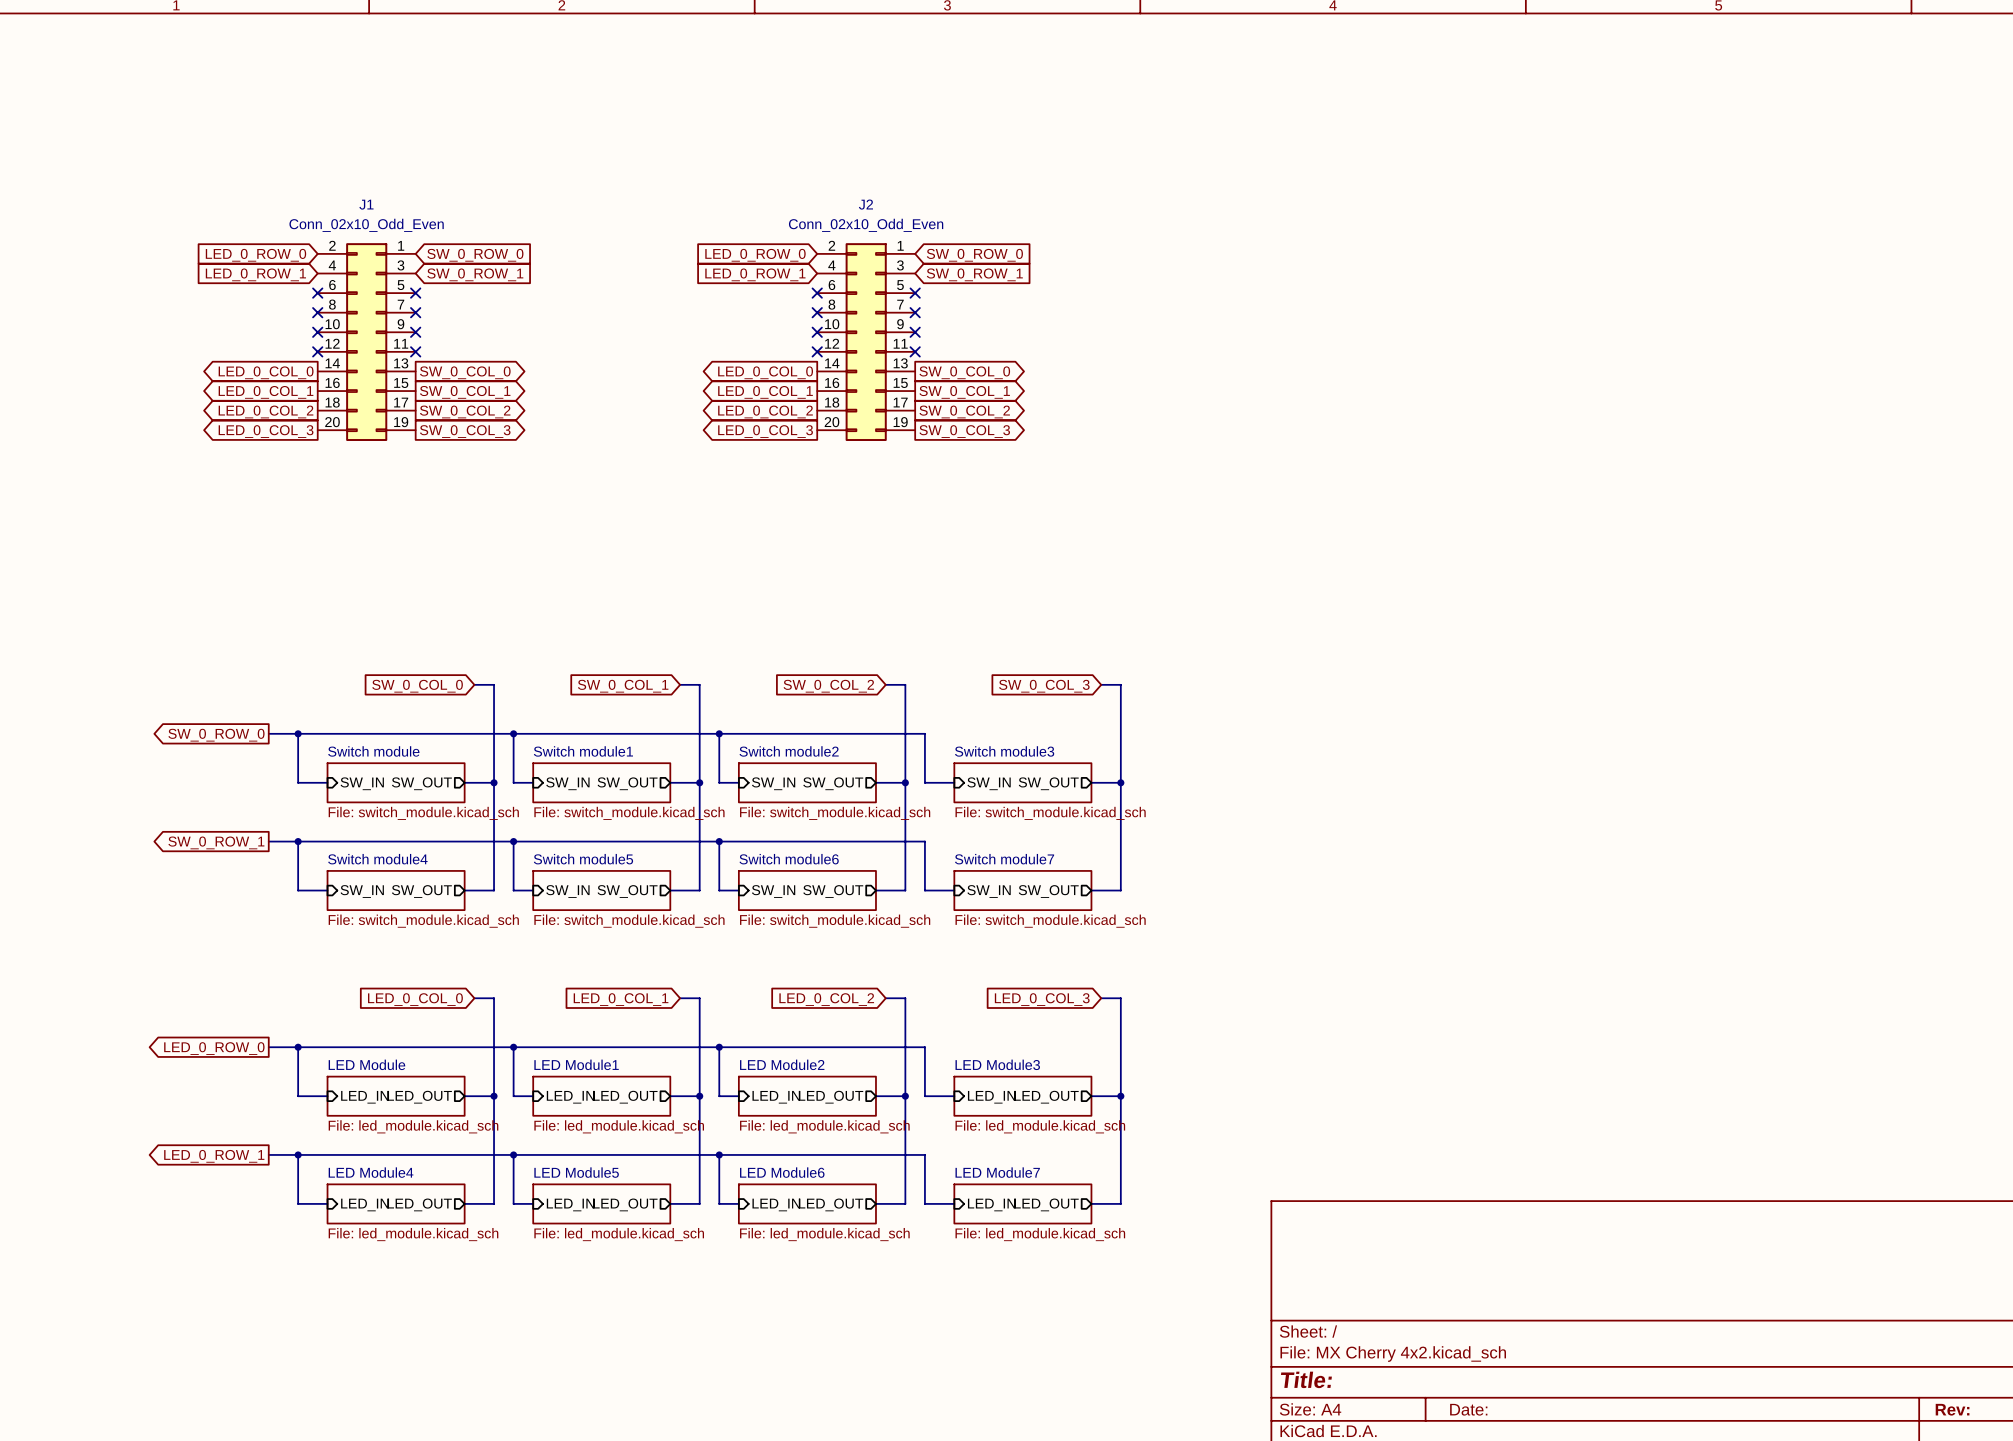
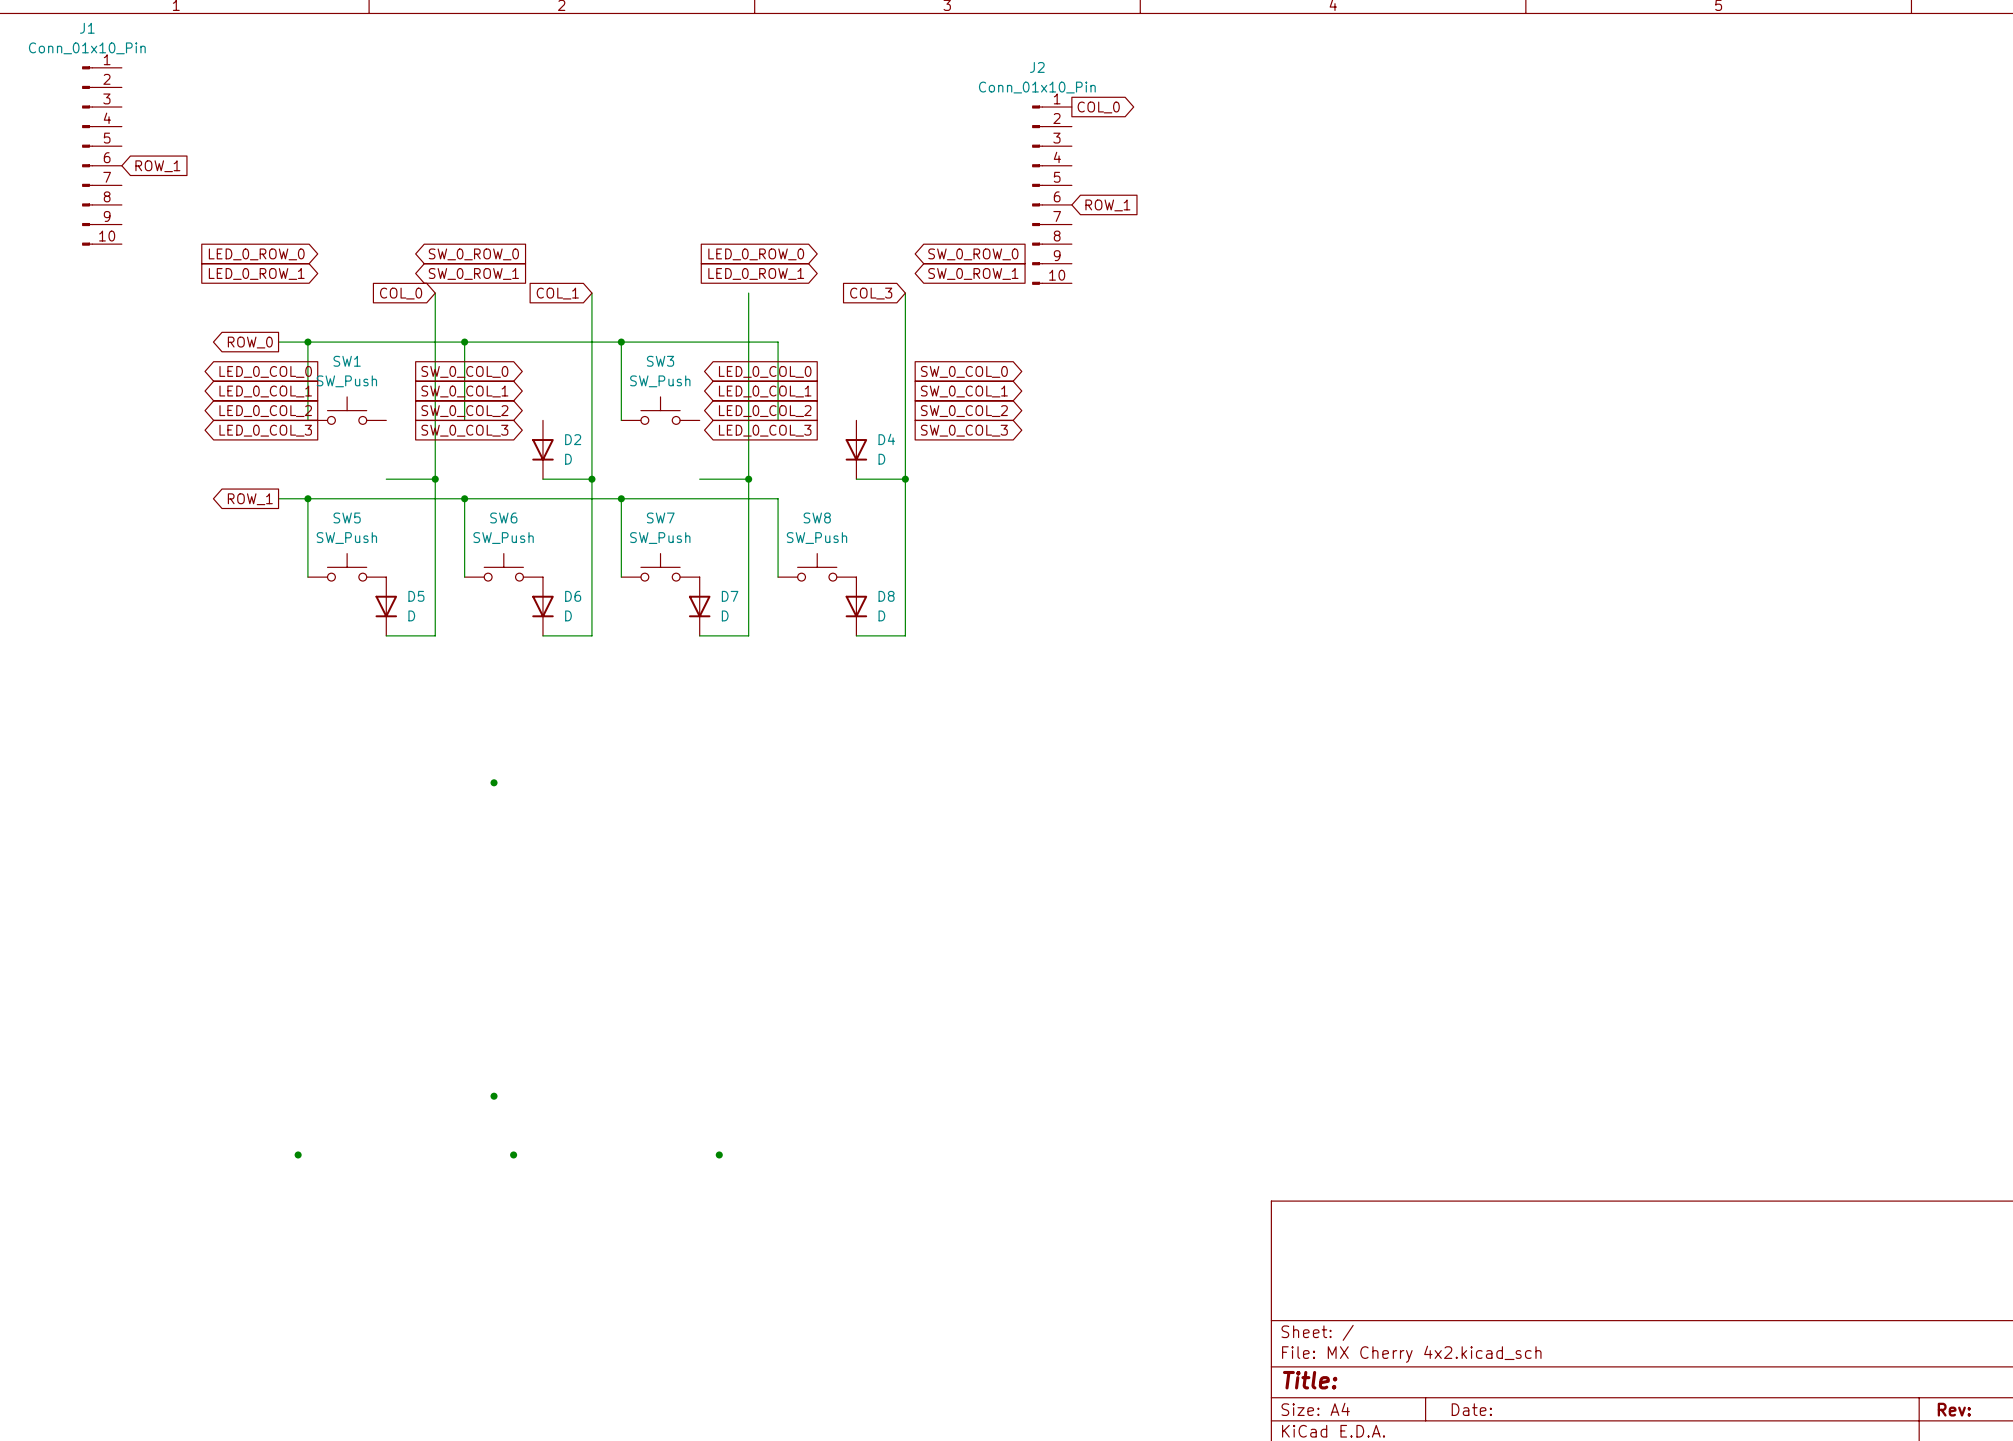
global label: none -> COL_0 (1098, 107)
global label: none -> ROW_1 (157, 166)
J1 name position: J1 (366, 204) -> J1 (87, 28)
J2 name position: J2 (865, 204) -> J2 (1037, 67)
global label: none -> ROW_1 (1107, 205)
J1 value: Conn_02x10_Odd_Even (366, 225) -> Conn_01x10_Pin (87, 48)
J2 value: Conn_02x10_Odd_Even (866, 225) -> Conn_01x10_Pin (1037, 87)
J1 symbol: [317, 243, 416, 441] -> [82, 66, 122, 246]
J2 symbol: [817, 243, 916, 441] -> [1032, 105, 1072, 285]
no-connect mark: (317, 293) -> none
no-connect mark: (415, 293) -> none
wire: none -> (435, 293) (435, 635) (386, 635)
wire: none -> (591, 293) (591, 635) (542, 635)
wire: none -> (748, 293) (748, 635) (699, 635)
no-connect mark: (817, 293) -> none
wire: none -> (905, 293) (905, 635) (856, 635)
no-connect mark: (915, 293) -> none
global label: none -> COL_0 (401, 293)
global label: none -> COL_1 (557, 293)
global label: none -> COL_3 (871, 293)
no-connect mark: (317, 312) -> none
no-connect mark: (415, 312) -> none
no-connect mark: (817, 312) -> none
no-connect mark: (915, 312) -> none
no-connect mark: (317, 332) -> none
no-connect mark: (415, 332) -> none
no-connect mark: (817, 332) -> none
no-connect mark: (915, 332) -> none
wire: none -> (278, 342) (778, 342) (778, 420)
wire: none -> (307, 342) (307, 420)
junction: none -> (307, 342)
wire: none -> (464, 342) (464, 420)
junction: none -> (464, 342)
wire: none -> (621, 342) (621, 420)
junction: none -> (621, 342)
global label: none -> ROW_0 (250, 342)
no-connect mark: (317, 351) -> none
no-connect mark: (415, 351) -> none
no-connect mark: (817, 351) -> none
no-connect mark: (915, 351) -> none
SW1: none -> SW_Push (347, 410)
SW3: none -> SW_Push (660, 410)
D2: none -> D (542, 449)
D4: none -> D (856, 449)
wire: none -> (386, 479) (435, 479)
junction: none -> (435, 479)
wire: none -> (542, 479) (591, 479)
junction: none -> (591, 479)
wire: none -> (699, 479) (748, 479)
junction: none -> (748, 479)
wire: none -> (856, 479) (905, 479)
junction: none -> (905, 479)
wire: none -> (278, 498) (778, 498) (778, 577)
wire: none -> (307, 498) (307, 577)
junction: none -> (307, 498)
wire: none -> (464, 498) (464, 577)
junction: none -> (464, 498)
wire: none -> (621, 498) (621, 577)
junction: none -> (621, 498)
global label: none -> ROW_1 (250, 499)
SW5: none -> SW_Push (347, 567)
SW6: none -> SW_Push (503, 567)
SW7: none -> SW_Push (660, 567)
SW8: none -> SW_Push (817, 567)
D5: none -> D (386, 606)
D6: none -> D (542, 606)
D7: none -> D (699, 606)
D8: none -> D (856, 606)
wire: (474, 684) (494, 684) (494, 890) (464, 890) -> none
wire: (680, 684) (699, 684) (699, 890) (670, 890) -> none
wire: (885, 684) (905, 684) (905, 890) (875, 890) -> none
wire: (1101, 684) (1120, 684) (1120, 890) (1091, 890) -> none
global label: SW_0_COL_0 (417, 686) -> none
global label: SW_0_COL_1 (623, 686) -> none
global label: SW_0_COL_2 (828, 686) -> none
global label: SW_0_COL_3 (1044, 686) -> none
wire: (268, 733) (924, 733) (924, 782) (954, 782) -> none
wire: (298, 733) (298, 782) (327, 782) -> none
junction: (298, 733) -> none
wire: (513, 733) (513, 782) (533, 782) -> none
junction: (513, 733) -> none
wire: (719, 733) (719, 782) (738, 782) -> none
junction: (719, 733) -> none
global label: SW_0_ROW_0 (216, 735) -> none
sheet Switch module: File: switch_module.kicad_sch (396, 782) -> none
wire: (464, 782) (494, 782) -> none
sheet Switch module1: File: switch_module.kicad_sch (601, 782) -> none
wire: (670, 782) (699, 782) -> none
junction: (699, 782) -> none
sheet Switch module2: File: switch_module.kicad_sch (807, 782) -> none
wire: (875, 782) (905, 782) -> none
junction: (905, 782) -> none
sheet Switch module3: File: switch_module.kicad_sch (1022, 782) -> none
wire: (1091, 782) (1120, 782) -> none
junction: (1120, 782) -> none
sheet pin: SW_IN (362, 783) -> none
sheet pin: SW_OUT (421, 783) -> none
sheet pin: SW_IN (567, 783) -> none
sheet pin: SW_OUT (627, 783) -> none
sheet pin: SW_IN (773, 783) -> none
sheet pin: SW_OUT (833, 783) -> none
sheet pin: SW_IN (989, 783) -> none
sheet pin: SW_OUT (1048, 783) -> none
wire: (268, 841) (924, 841) (924, 890) (954, 890) -> none
wire: (298, 841) (298, 890) (327, 890) -> none
junction: (298, 841) -> none
wire: (513, 841) (513, 890) (533, 890) -> none
junction: (513, 841) -> none
wire: (719, 841) (719, 890) (738, 890) -> none
junction: (719, 841) -> none
global label: SW_0_ROW_1 (216, 842) -> none
sheet Switch module4: File: switch_module.kicad_sch (396, 890) -> none
sheet Switch module5: File: switch_module.kicad_sch (601, 890) -> none
sheet Switch module6: File: switch_module.kicad_sch (807, 890) -> none
sheet Switch module7: File: switch_module.kicad_sch (1022, 890) -> none
sheet pin: SW_IN (362, 891) -> none
sheet pin: SW_OUT (421, 891) -> none
sheet pin: SW_IN (567, 891) -> none
sheet pin: SW_OUT (627, 891) -> none
sheet pin: SW_IN (773, 891) -> none
sheet pin: SW_OUT (833, 891) -> none
sheet pin: SW_IN (989, 891) -> none
sheet pin: SW_OUT (1048, 891) -> none
wire: (474, 998) (494, 998) (494, 1203) (464, 1203) -> none
wire: (680, 998) (699, 998) (699, 1203) (670, 1203) -> none
wire: (885, 998) (905, 998) (905, 1203) (875, 1203) -> none
wire: (1101, 998) (1120, 998) (1120, 1203) (1091, 1203) -> none
global label: LED_0_COL_0 (415, 999) -> none
global label: LED_0_COL_1 (621, 999) -> none
global label: LED_0_COL_2 (826, 999) -> none
global label: LED_0_COL_3 (1042, 999) -> none
wire: (268, 1047) (924, 1047) (924, 1096) (954, 1096) -> none
wire: (298, 1047) (298, 1096) (327, 1096) -> none
junction: (298, 1047) -> none
wire: (513, 1047) (513, 1096) (533, 1096) -> none
junction: (513, 1047) -> none
wire: (719, 1047) (719, 1096) (738, 1096) -> none
junction: (719, 1047) -> none
global label: LED_0_ROW_0 (214, 1048) -> none
sheet LED Module: File: led_module.kicad_sch (396, 1096) -> none
wire: (464, 1096) (494, 1096) -> none
sheet LED Module1: File: led_module.kicad_sch (601, 1096) -> none
wire: (670, 1096) (699, 1096) -> none
junction: (699, 1096) -> none
sheet LED Module2: File: led_module.kicad_sch (807, 1096) -> none
wire: (875, 1096) (905, 1096) -> none
junction: (905, 1096) -> none
sheet LED Module3: File: led_module.kicad_sch (1022, 1096) -> none
wire: (1091, 1096) (1120, 1096) -> none
junction: (1120, 1096) -> none
sheet pin: LED_IN (364, 1097) -> none
sheet pin: LED_OUT (419, 1097) -> none
sheet pin: LED_IN (570, 1097) -> none
sheet pin: LED_OUT (625, 1097) -> none
sheet pin: LED_IN (776, 1097) -> none
sheet pin: LED_OUT (831, 1097) -> none
sheet pin: LED_IN (991, 1097) -> none
sheet pin: LED_OUT (1046, 1097) -> none
wire: (268, 1154) (924, 1154) (924, 1203) (954, 1203) -> none
wire: (298, 1154) (298, 1203) (327, 1203) -> none
wire: (513, 1154) (513, 1203) (533, 1203) -> none
wire: (719, 1154) (719, 1203) (738, 1203) -> none
global label: LED_0_ROW_1 (214, 1156) -> none
sheet LED Module4: File: led_module.kicad_sch (396, 1203) -> none
sheet LED Module5: File: led_module.kicad_sch (601, 1203) -> none
sheet LED Module6: File: led_module.kicad_sch (807, 1203) -> none
sheet LED Module7: File: led_module.kicad_sch (1022, 1203) -> none
sheet pin: LED_IN (364, 1204) -> none
sheet pin: LED_OUT (419, 1204) -> none
sheet pin: LED_IN (570, 1204) -> none
sheet pin: LED_OUT (625, 1204) -> none
sheet pin: LED_IN (776, 1204) -> none
sheet pin: LED_OUT (831, 1204) -> none
sheet pin: LED_IN (991, 1204) -> none
sheet pin: LED_OUT (1046, 1204) -> none

